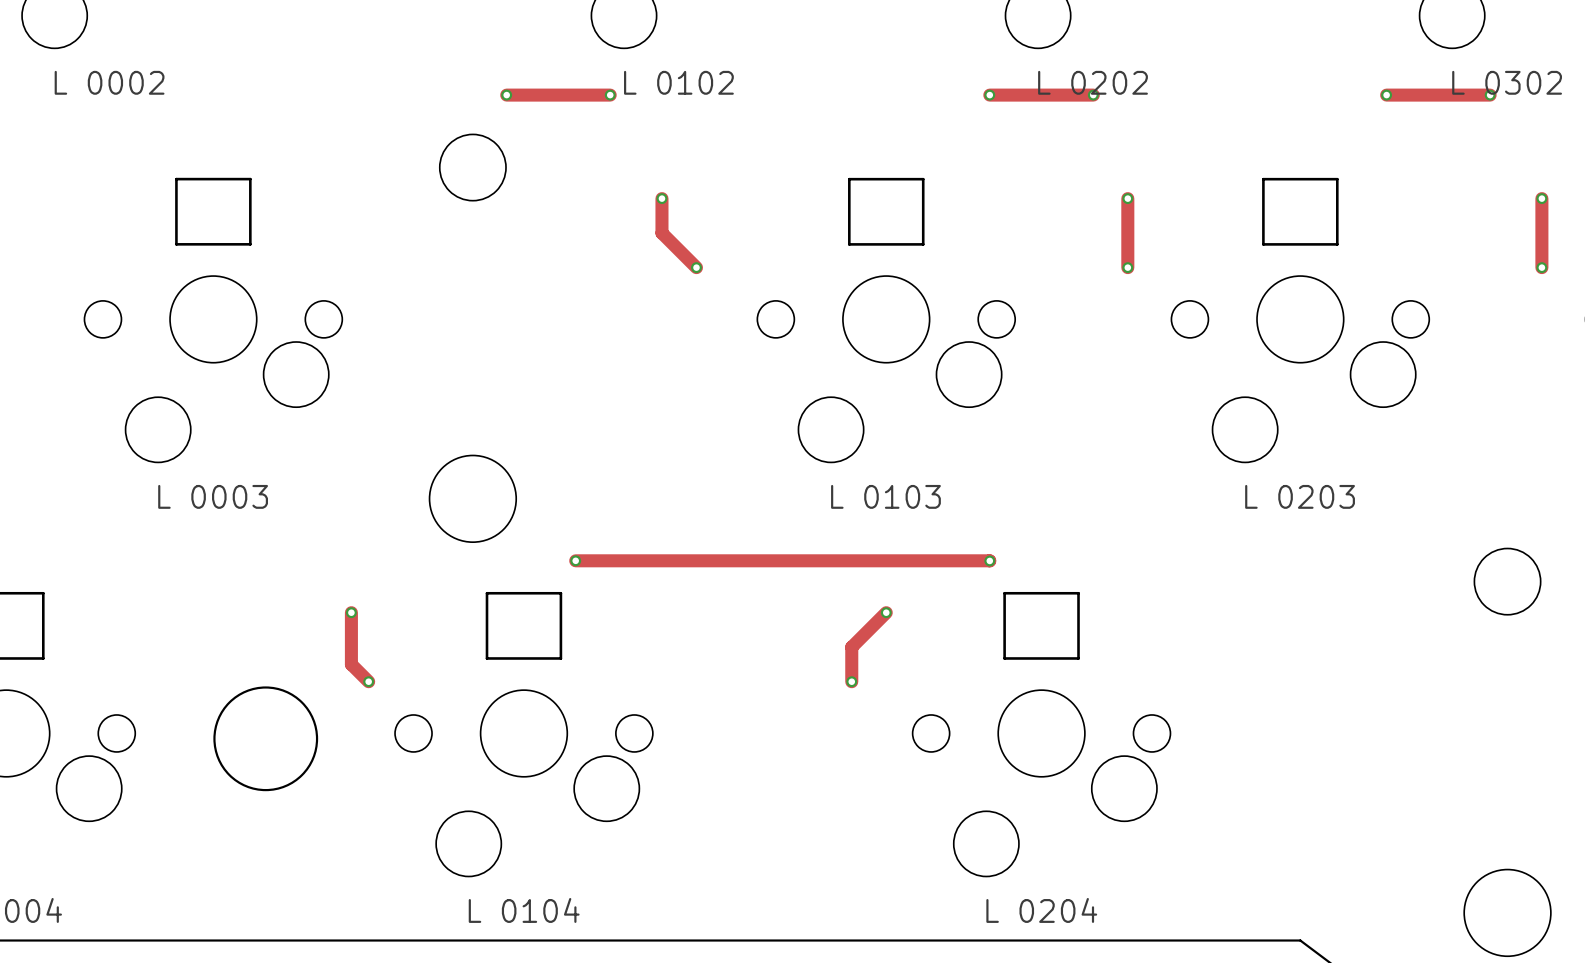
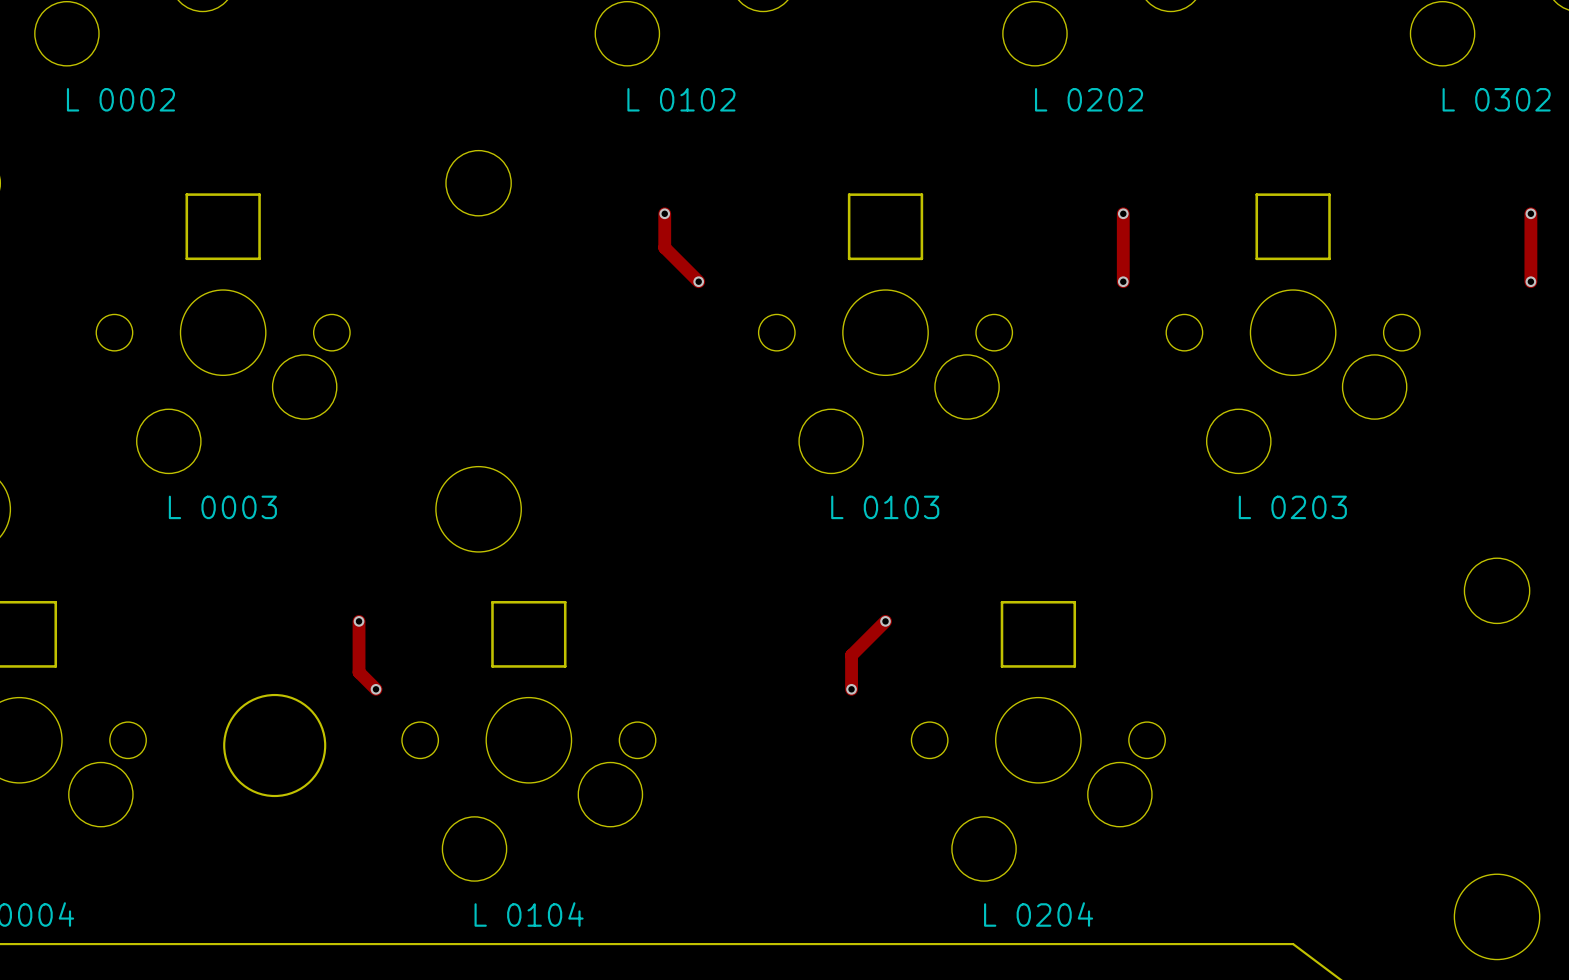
track: (506, 95) (610, 95) -> none
via: (506, 95) -> none
via: (610, 95) -> none
track: (989, 95) (1093, 95) -> none
via: (989, 95) -> none
via: (1093, 95) -> none
track: (1386, 95) (1490, 95) -> none
via: (1386, 95) -> none
via: (1490, 95) -> none
track: (575, 560) (989, 560) -> none
via: (575, 560) -> none
via: (989, 560) -> none

